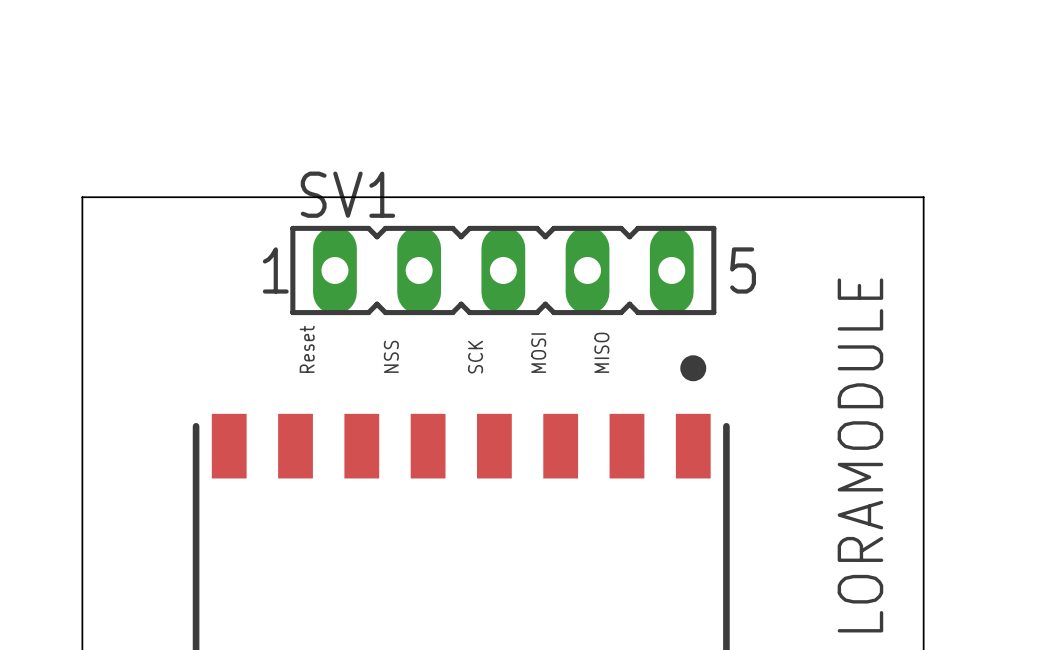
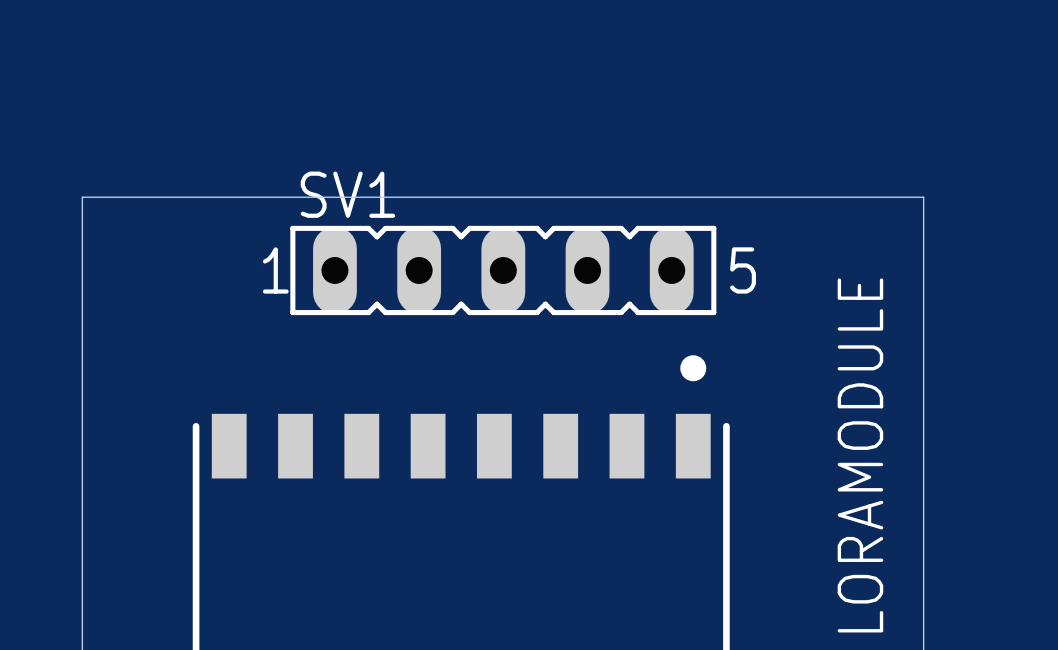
text: Reset (307, 349) -> none
text: MISO (601, 352) -> none
text: MOSI (538, 353) -> none
text: NSS (391, 356) -> none
text: SCK (475, 357) -> none

